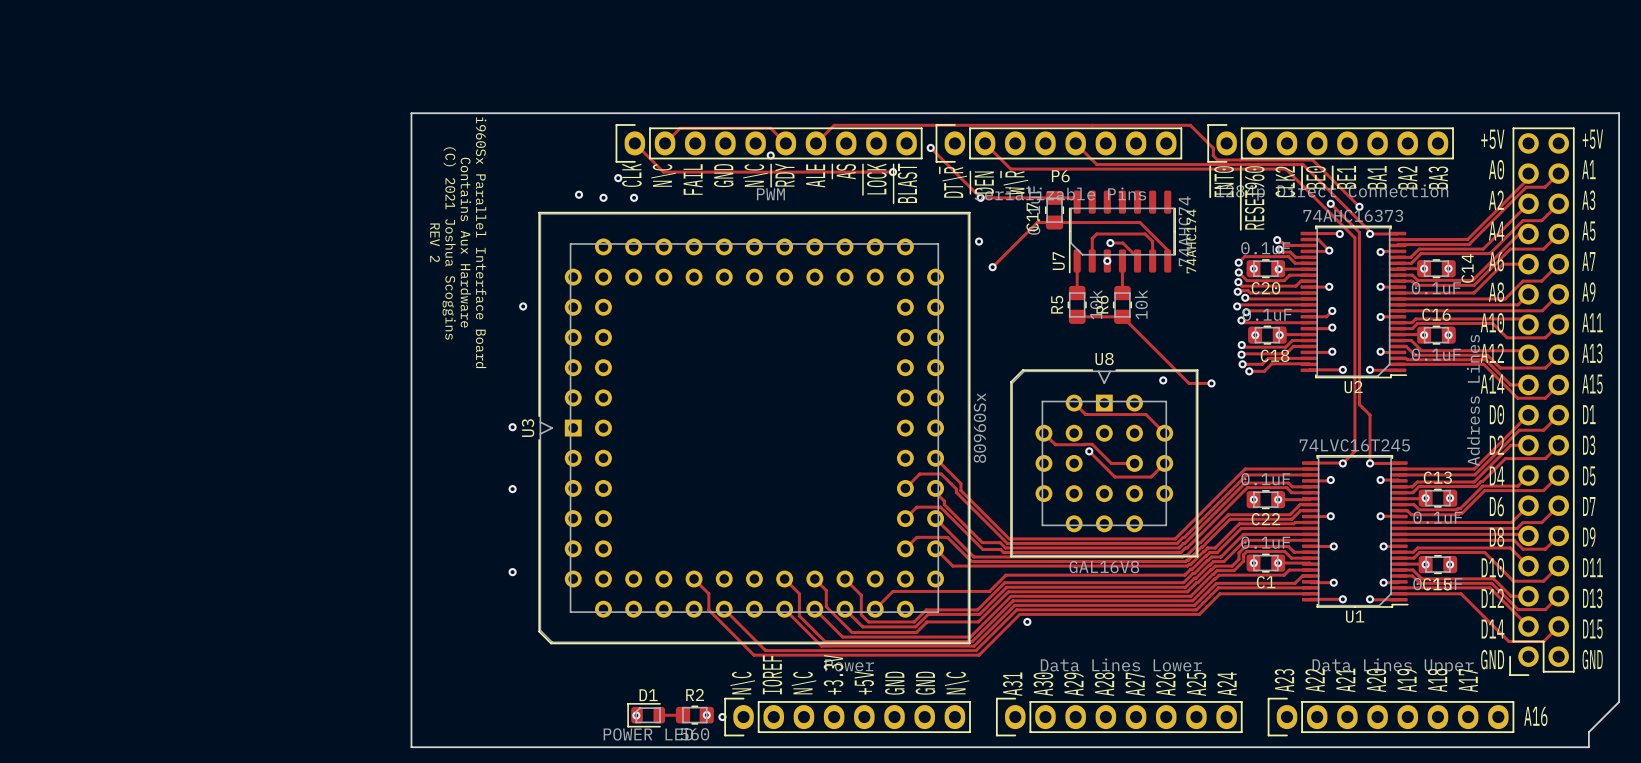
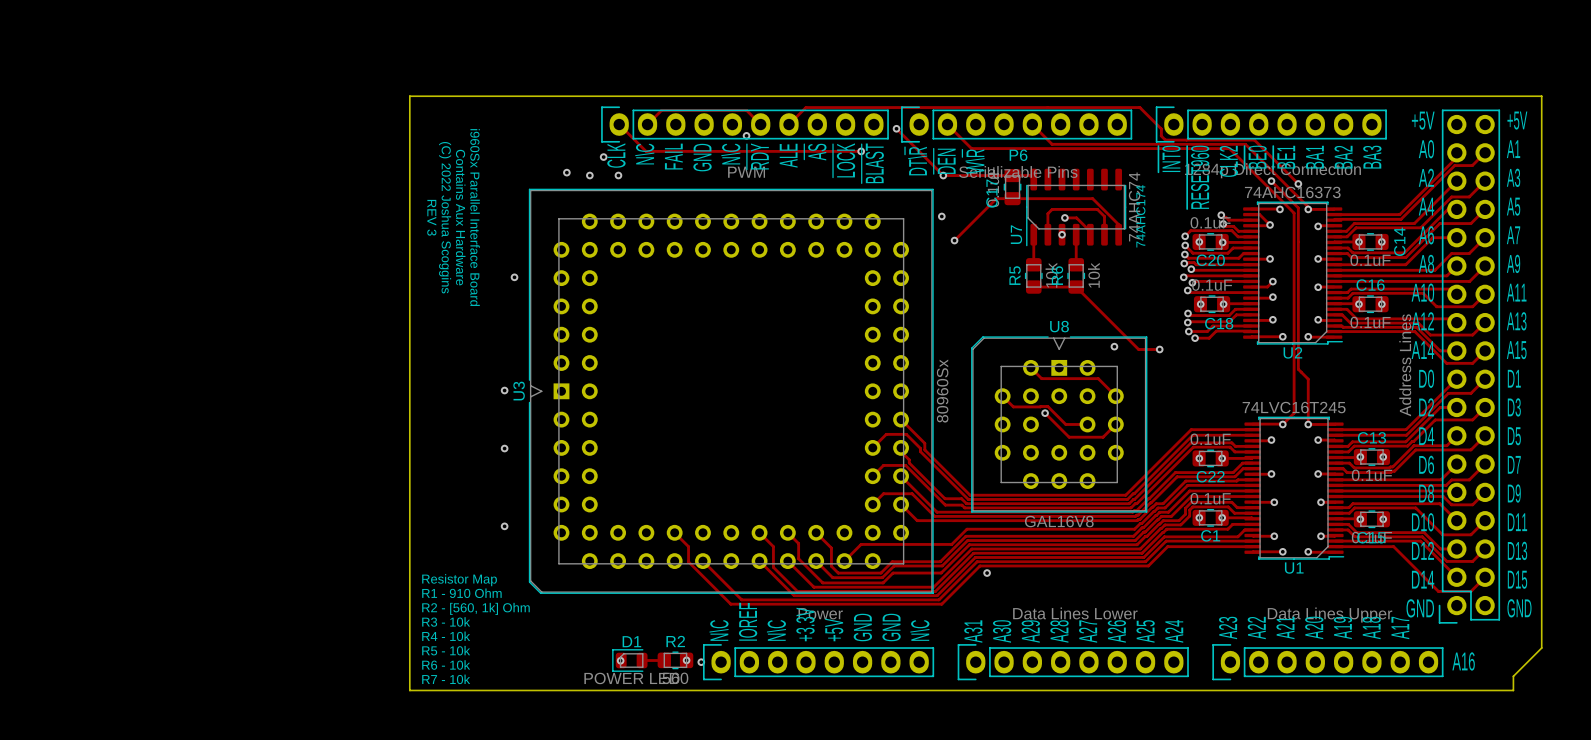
text: REV 2 (435, 242) -> REV 3 (431, 217)
text: (C) 2021 Joshua Scoggins (449, 243) -> (C) 2022 Joshua Scoggins (445, 217)
text: none -> Resistor Map (459, 580)
text: none -> R1 - 910 Ohm (461, 593)
text: none -> R2 - [560, 1k] Ohm (475, 608)
text: none -> R3 - 10k (446, 621)
text: none -> R4 - 10k (446, 636)
text: none -> R5 - 10k (446, 650)
text: none -> R6 - 10k (446, 665)
text: none -> R7 - 10k (446, 679)

